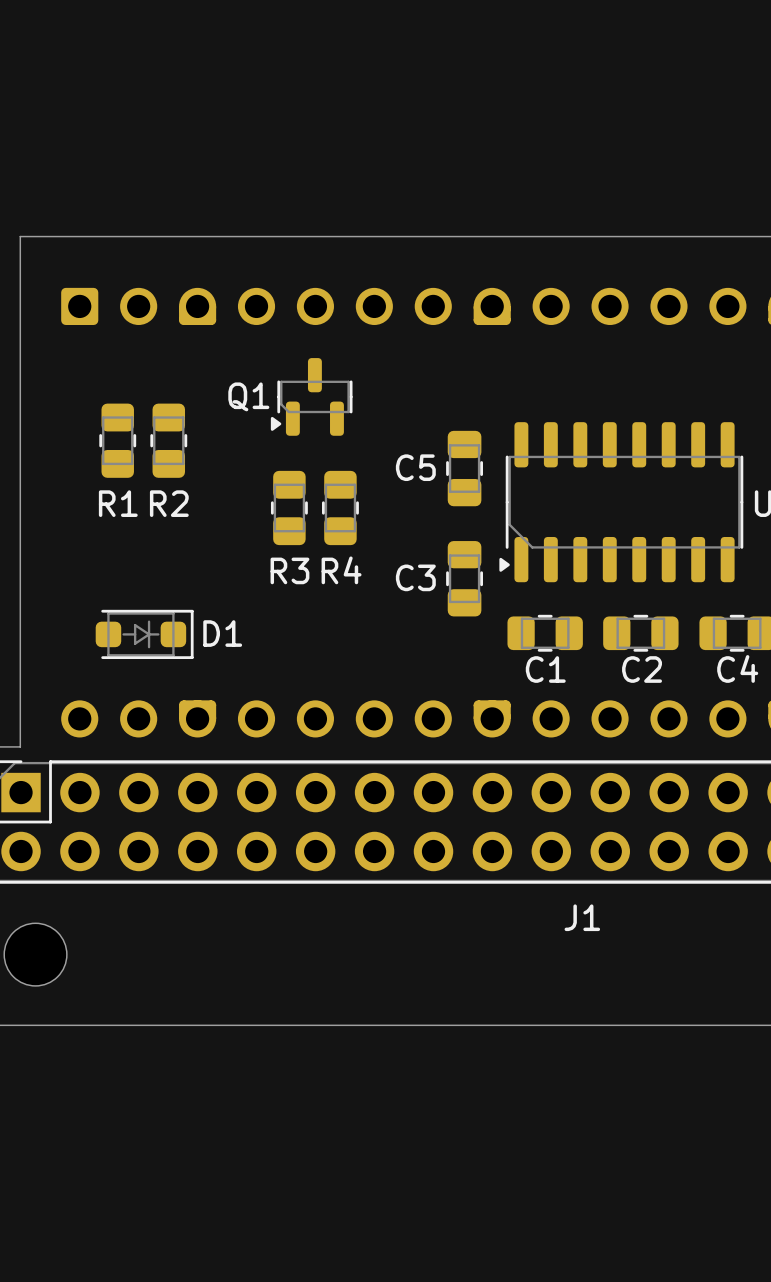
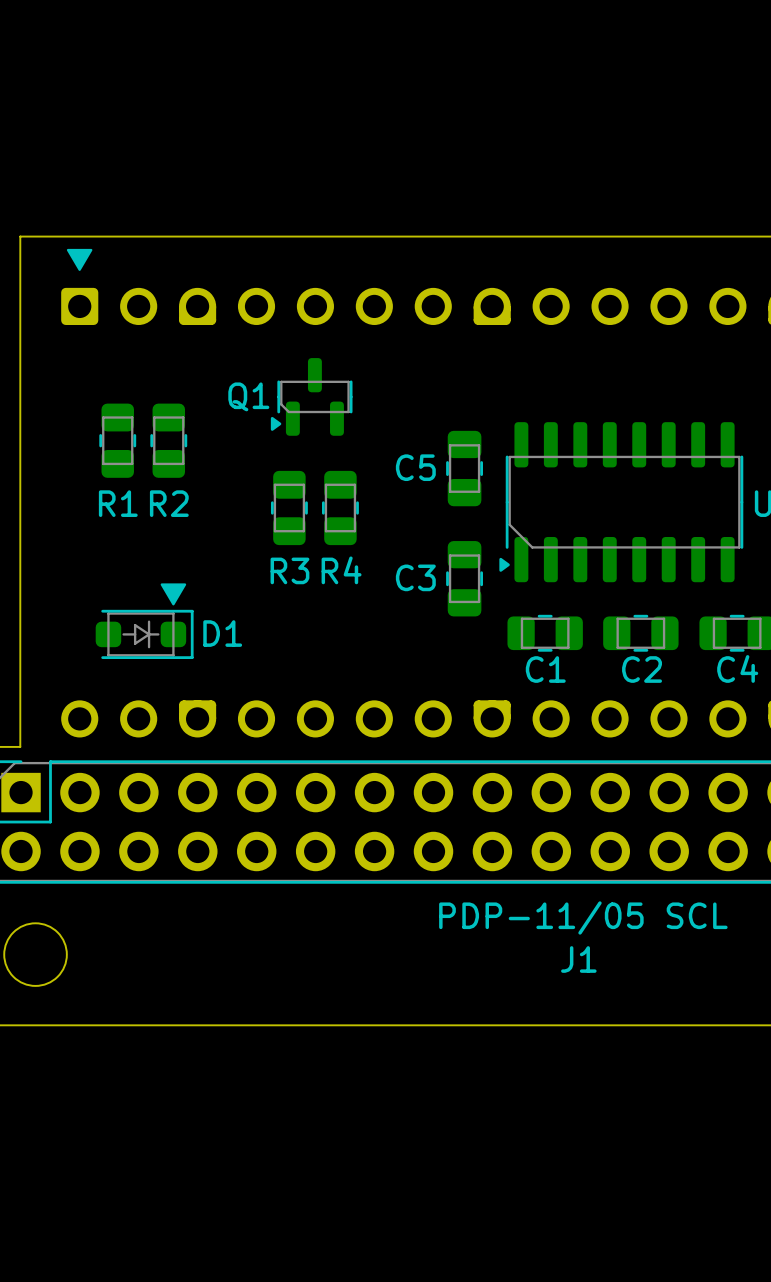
drawing: none -> [66, 248, 93, 271]
drawing: none -> [160, 583, 187, 606]
J1 name position: J1 (582, 917) -> J1 (578, 959)
text: none -> PDP-11/05 SCL (583, 917)

